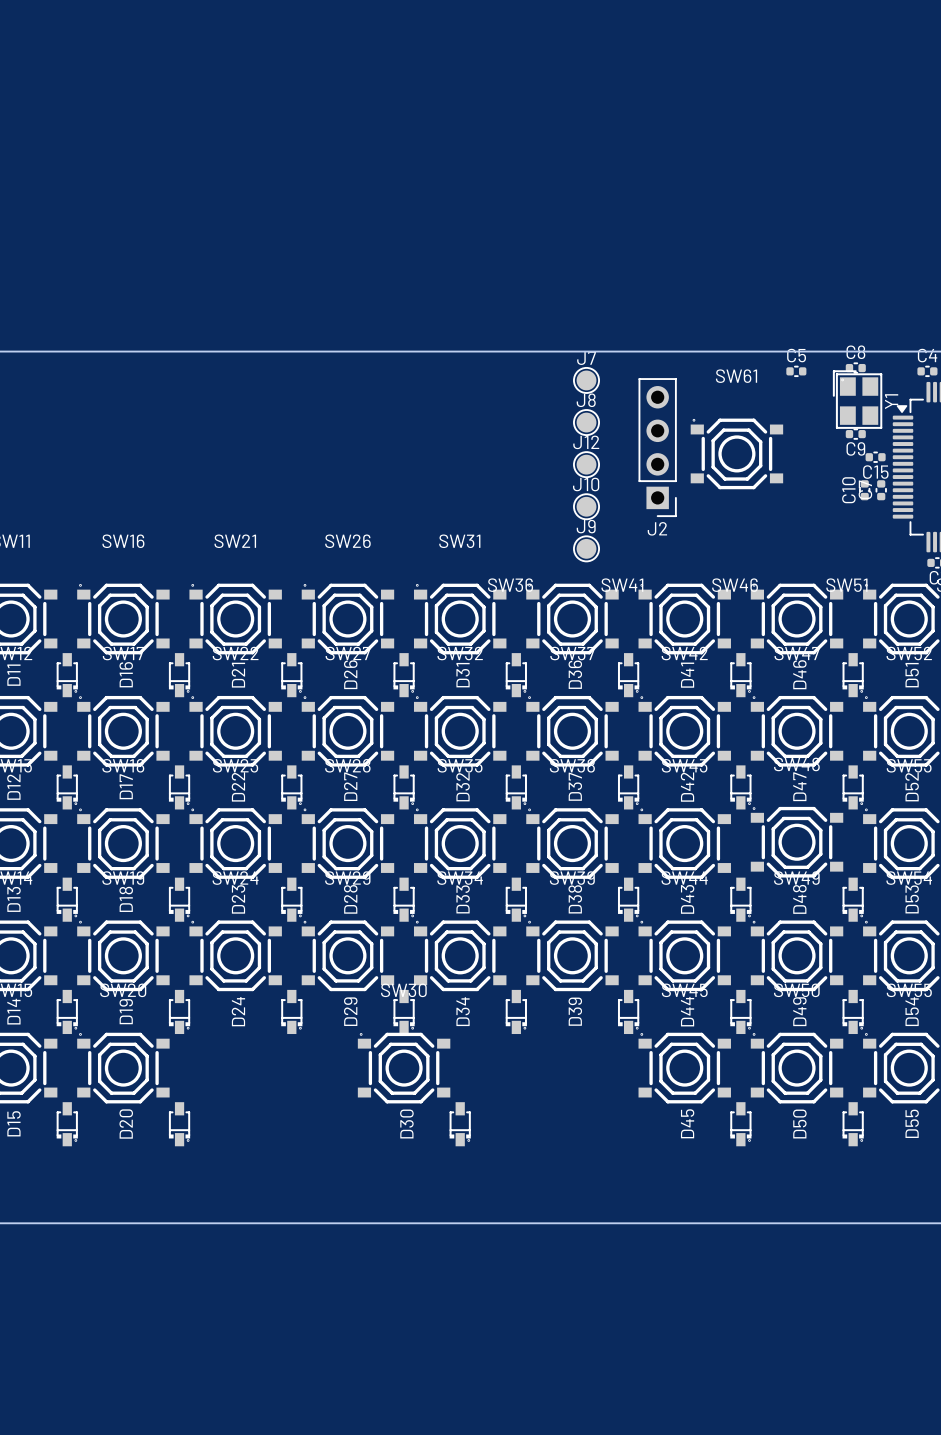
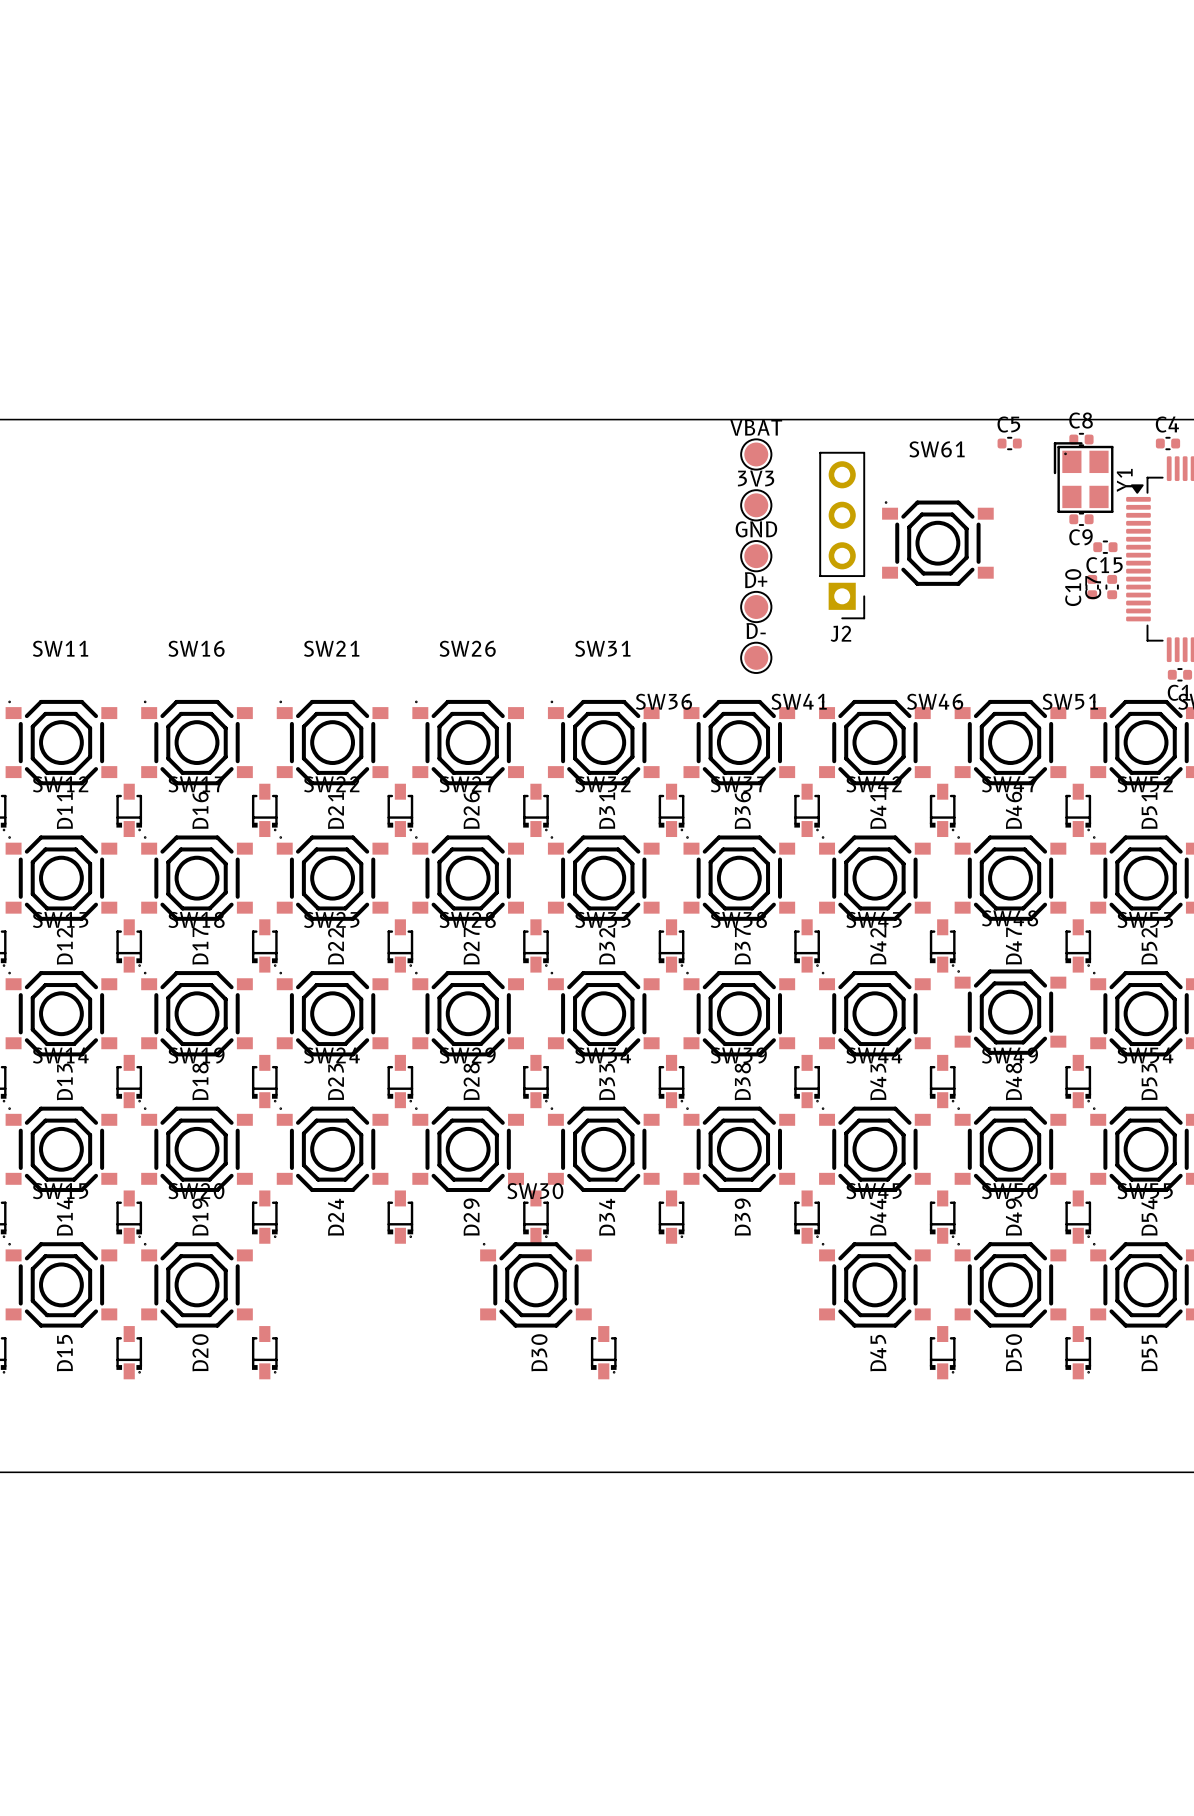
J7 name: J7 (586, 358) -> VBAT (756, 427)
J8 name: J8 (586, 400) -> 3V3 (756, 478)
J12 name: J12 (586, 442) -> GND (756, 529)
J10 name: J10 (586, 484) -> D+ (756, 580)
J9 name: J9 (586, 526) -> D- (756, 631)

